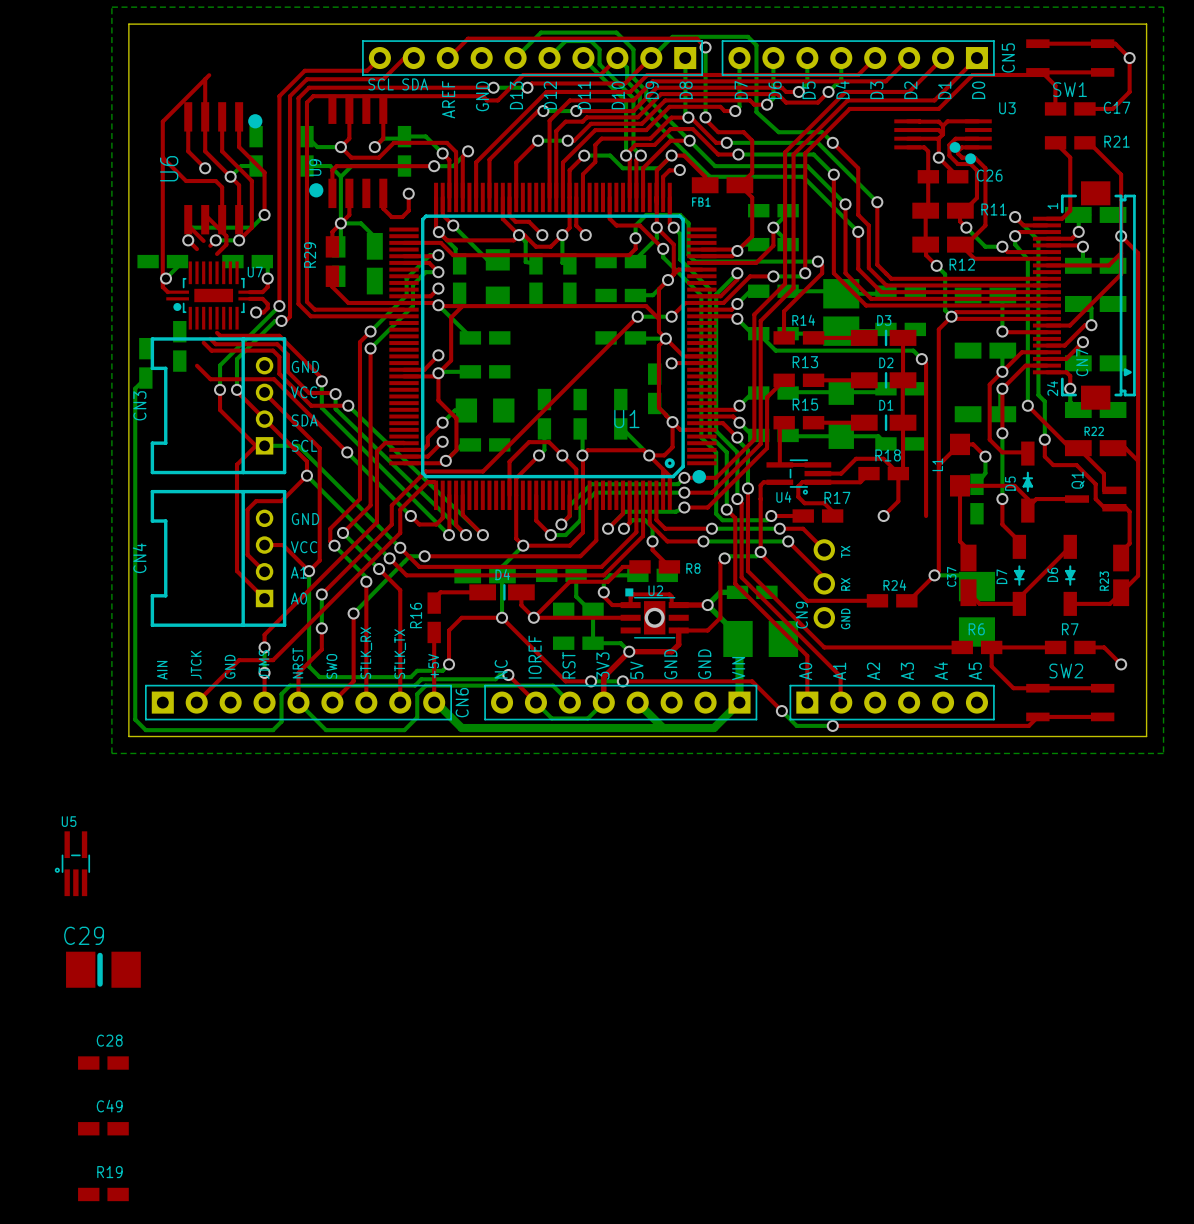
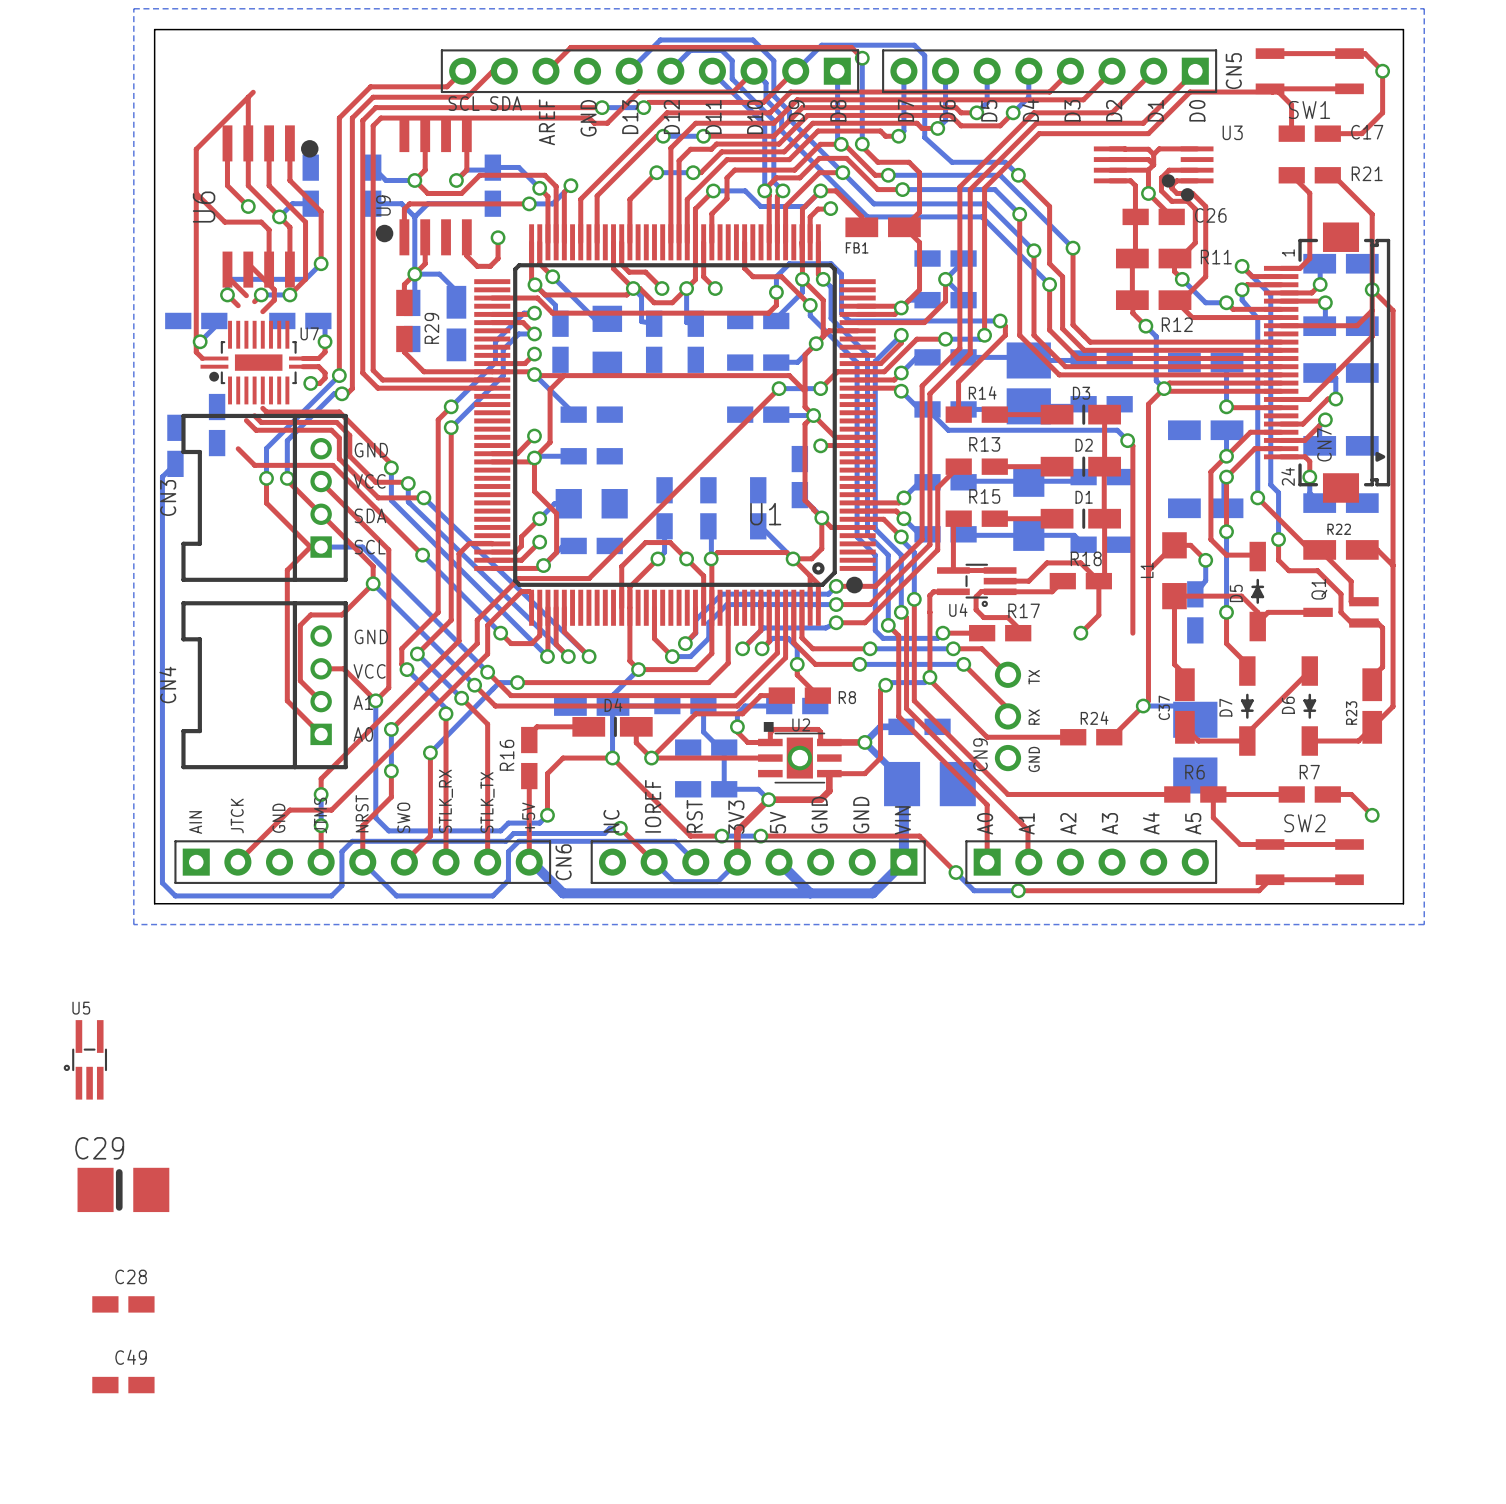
R29 name position: R29 (310, 255) -> R29 (431, 328)
R19: (103, 1194) -> none

